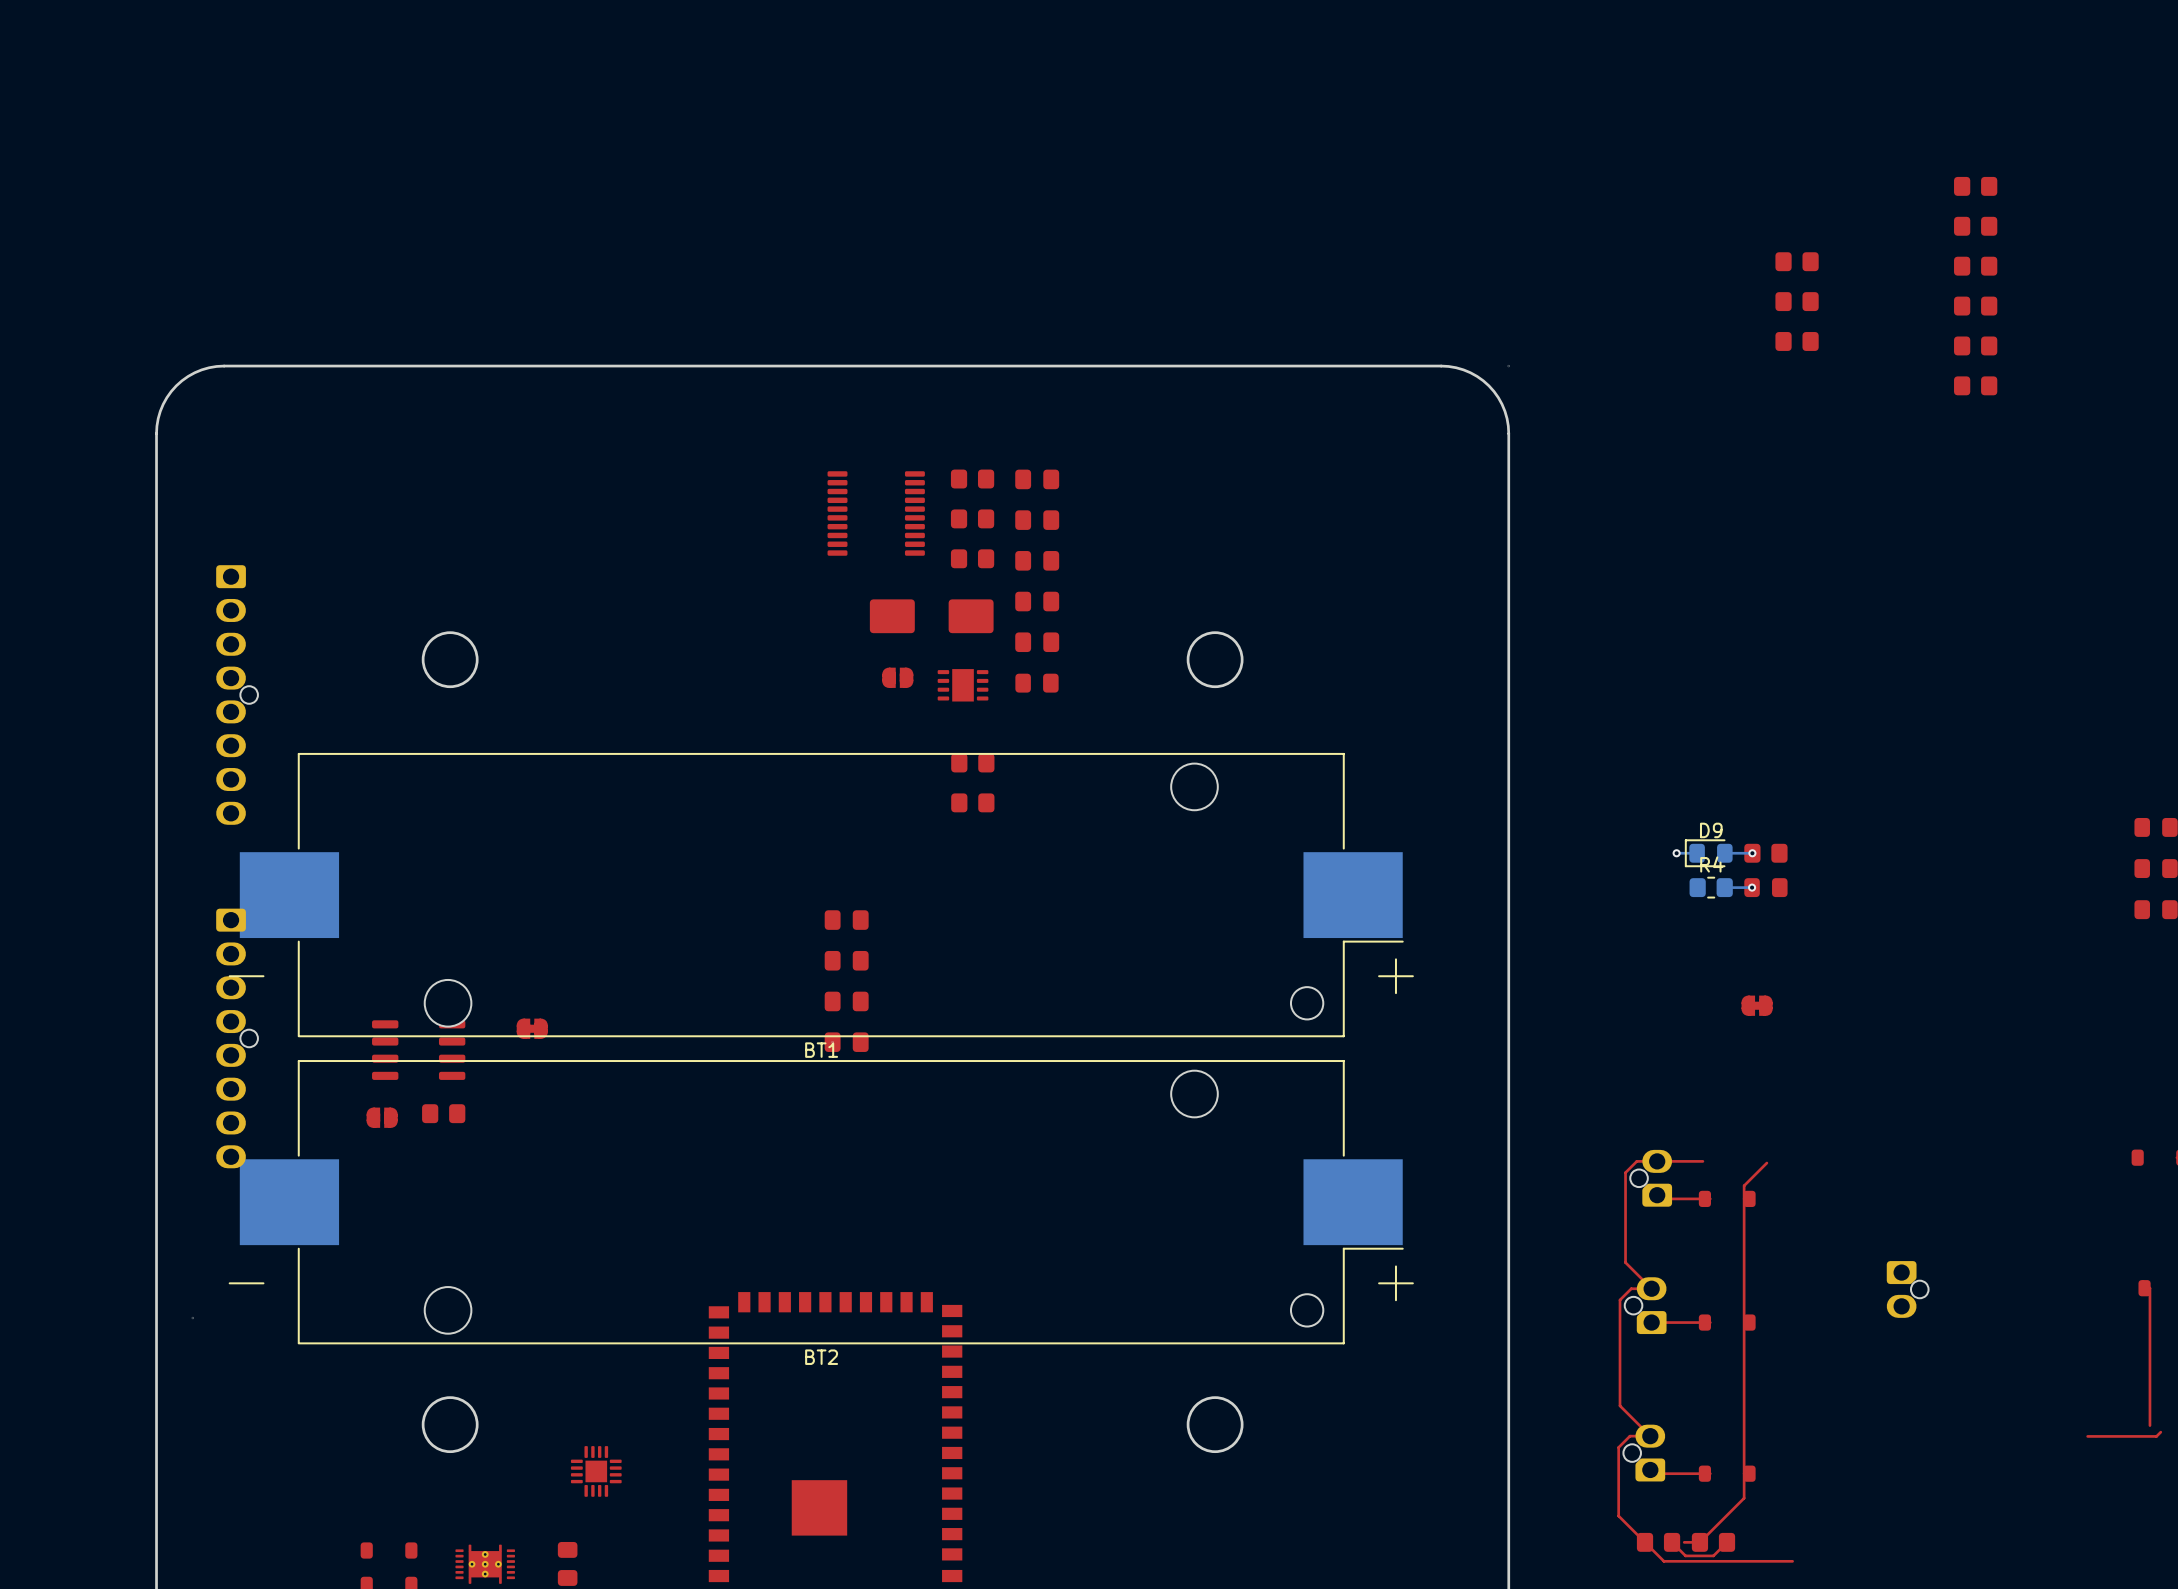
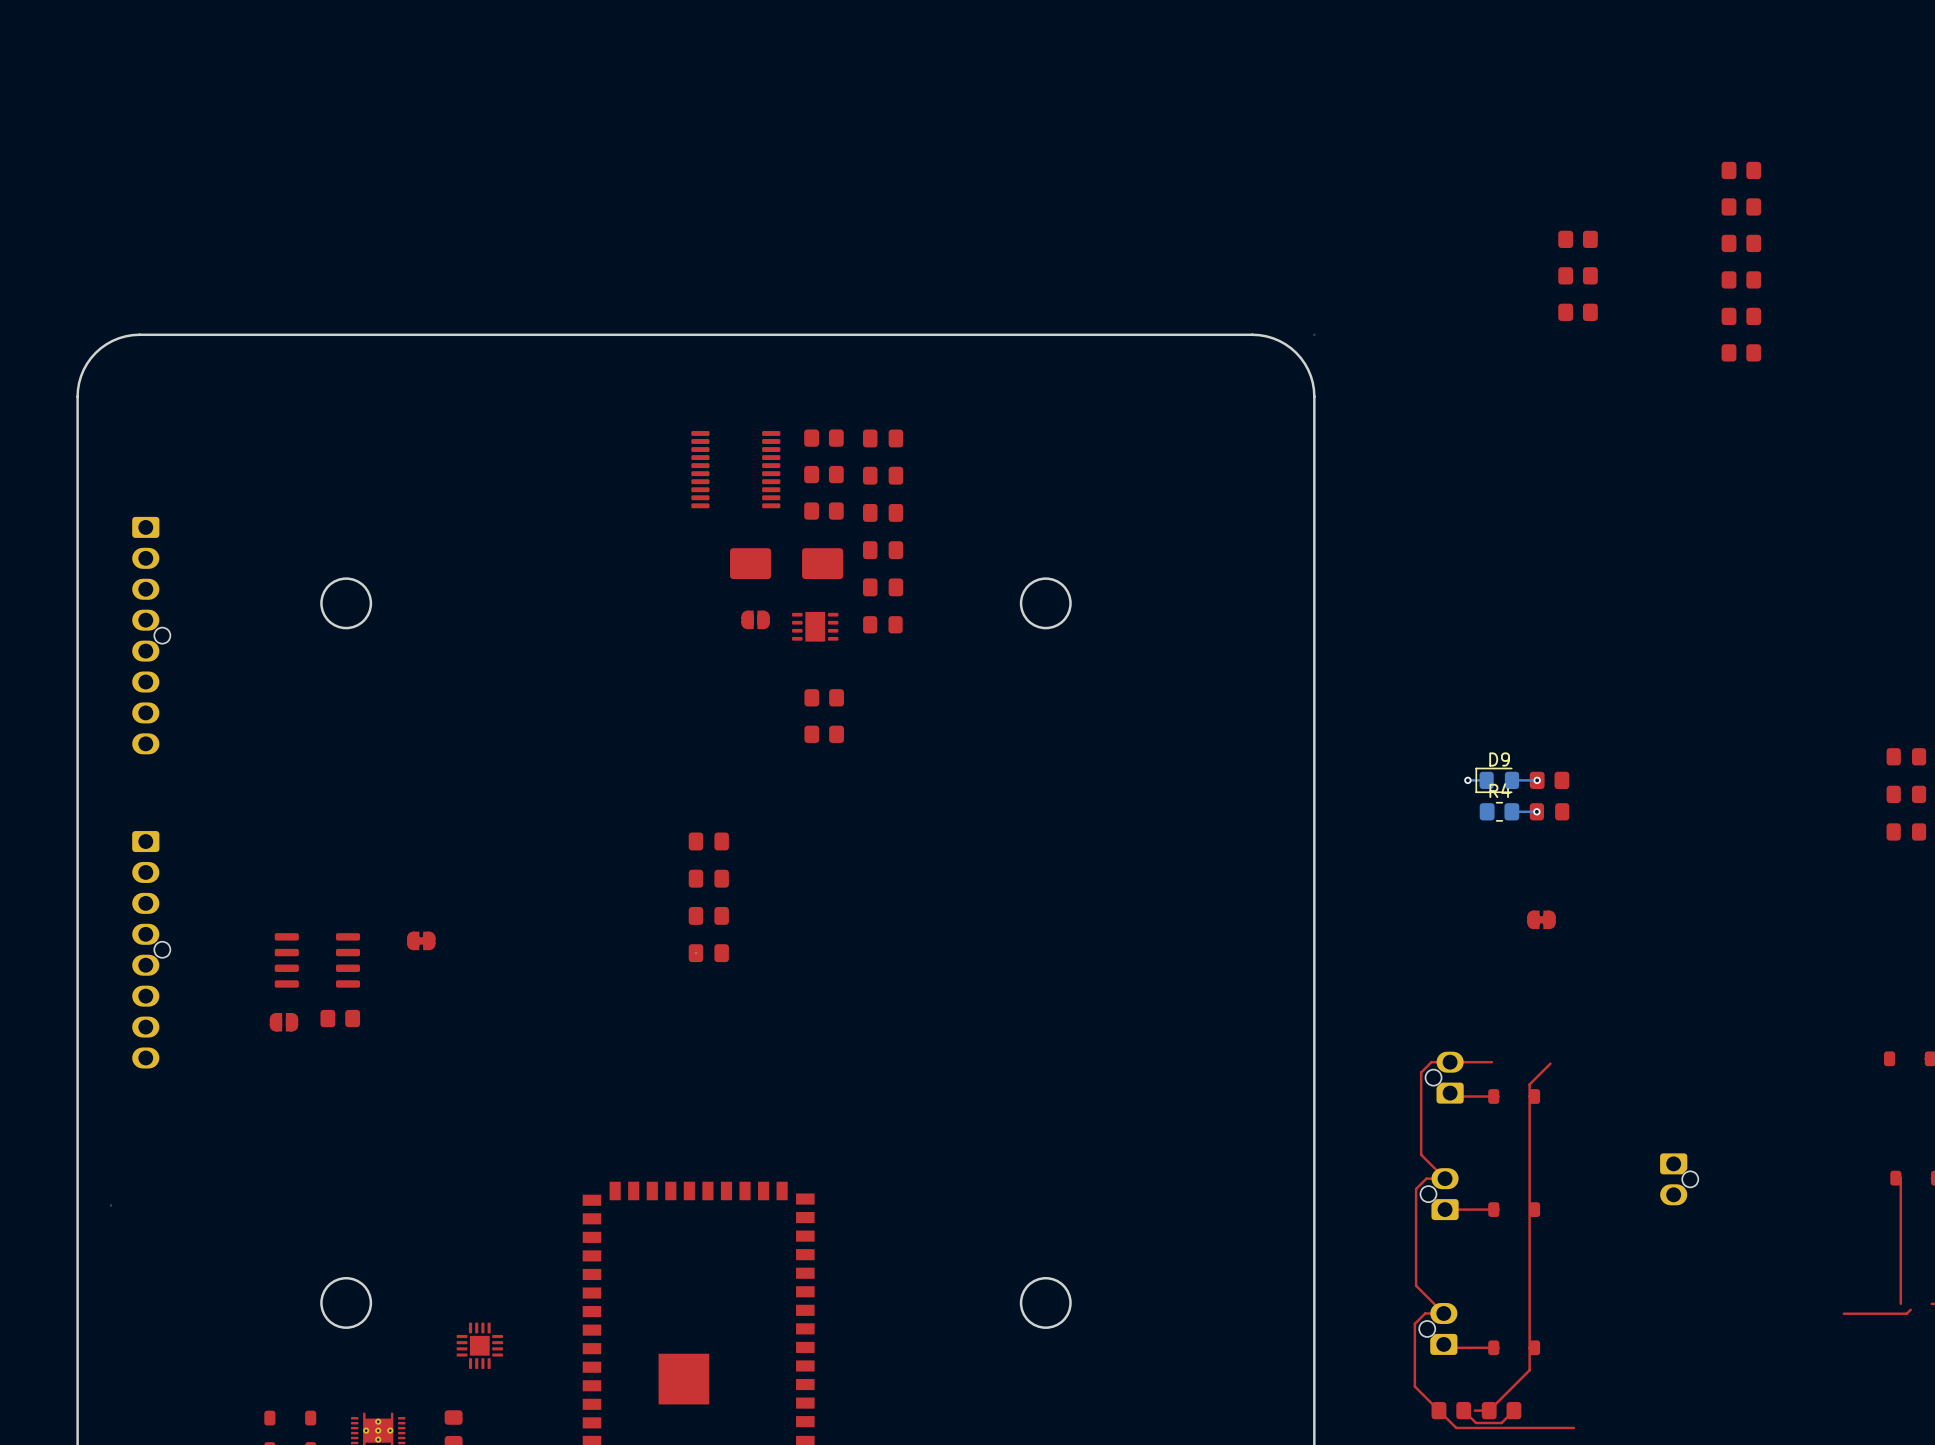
BT1: (821, 895) -> none
BT2: (821, 1202) -> none

